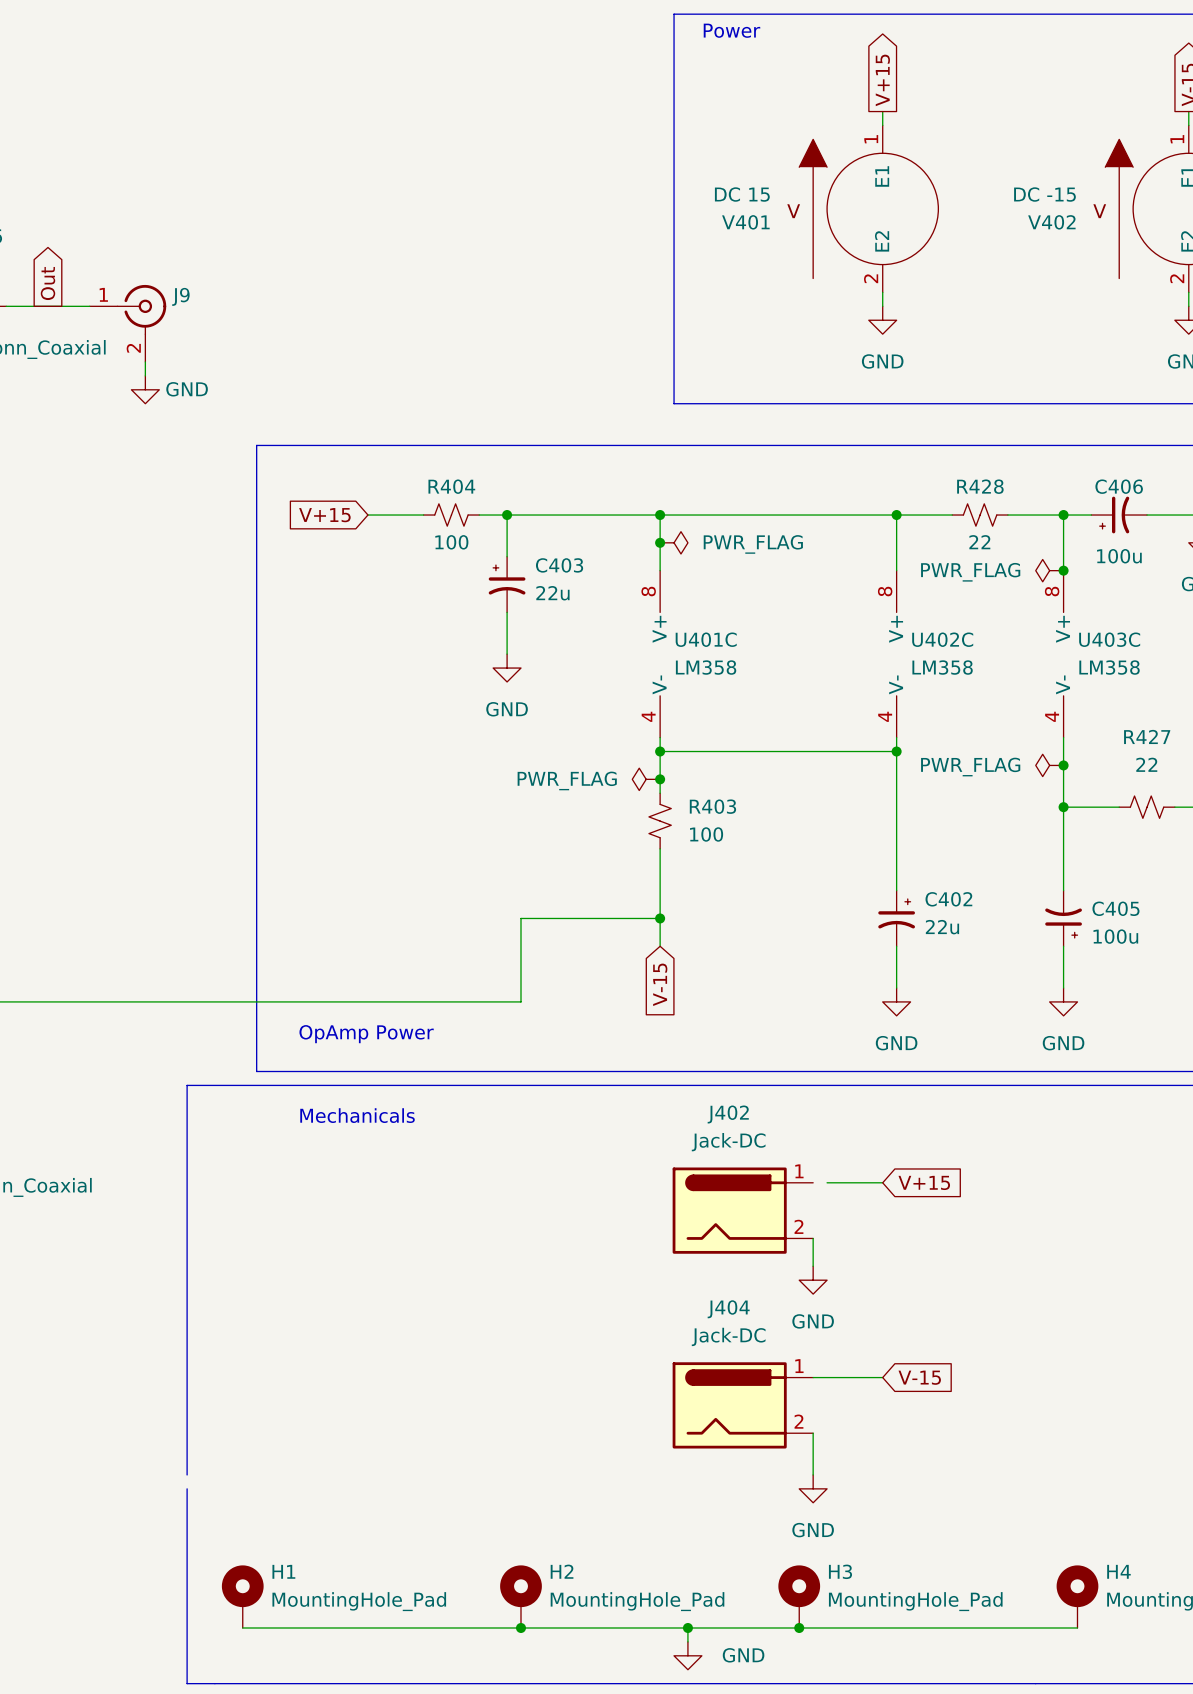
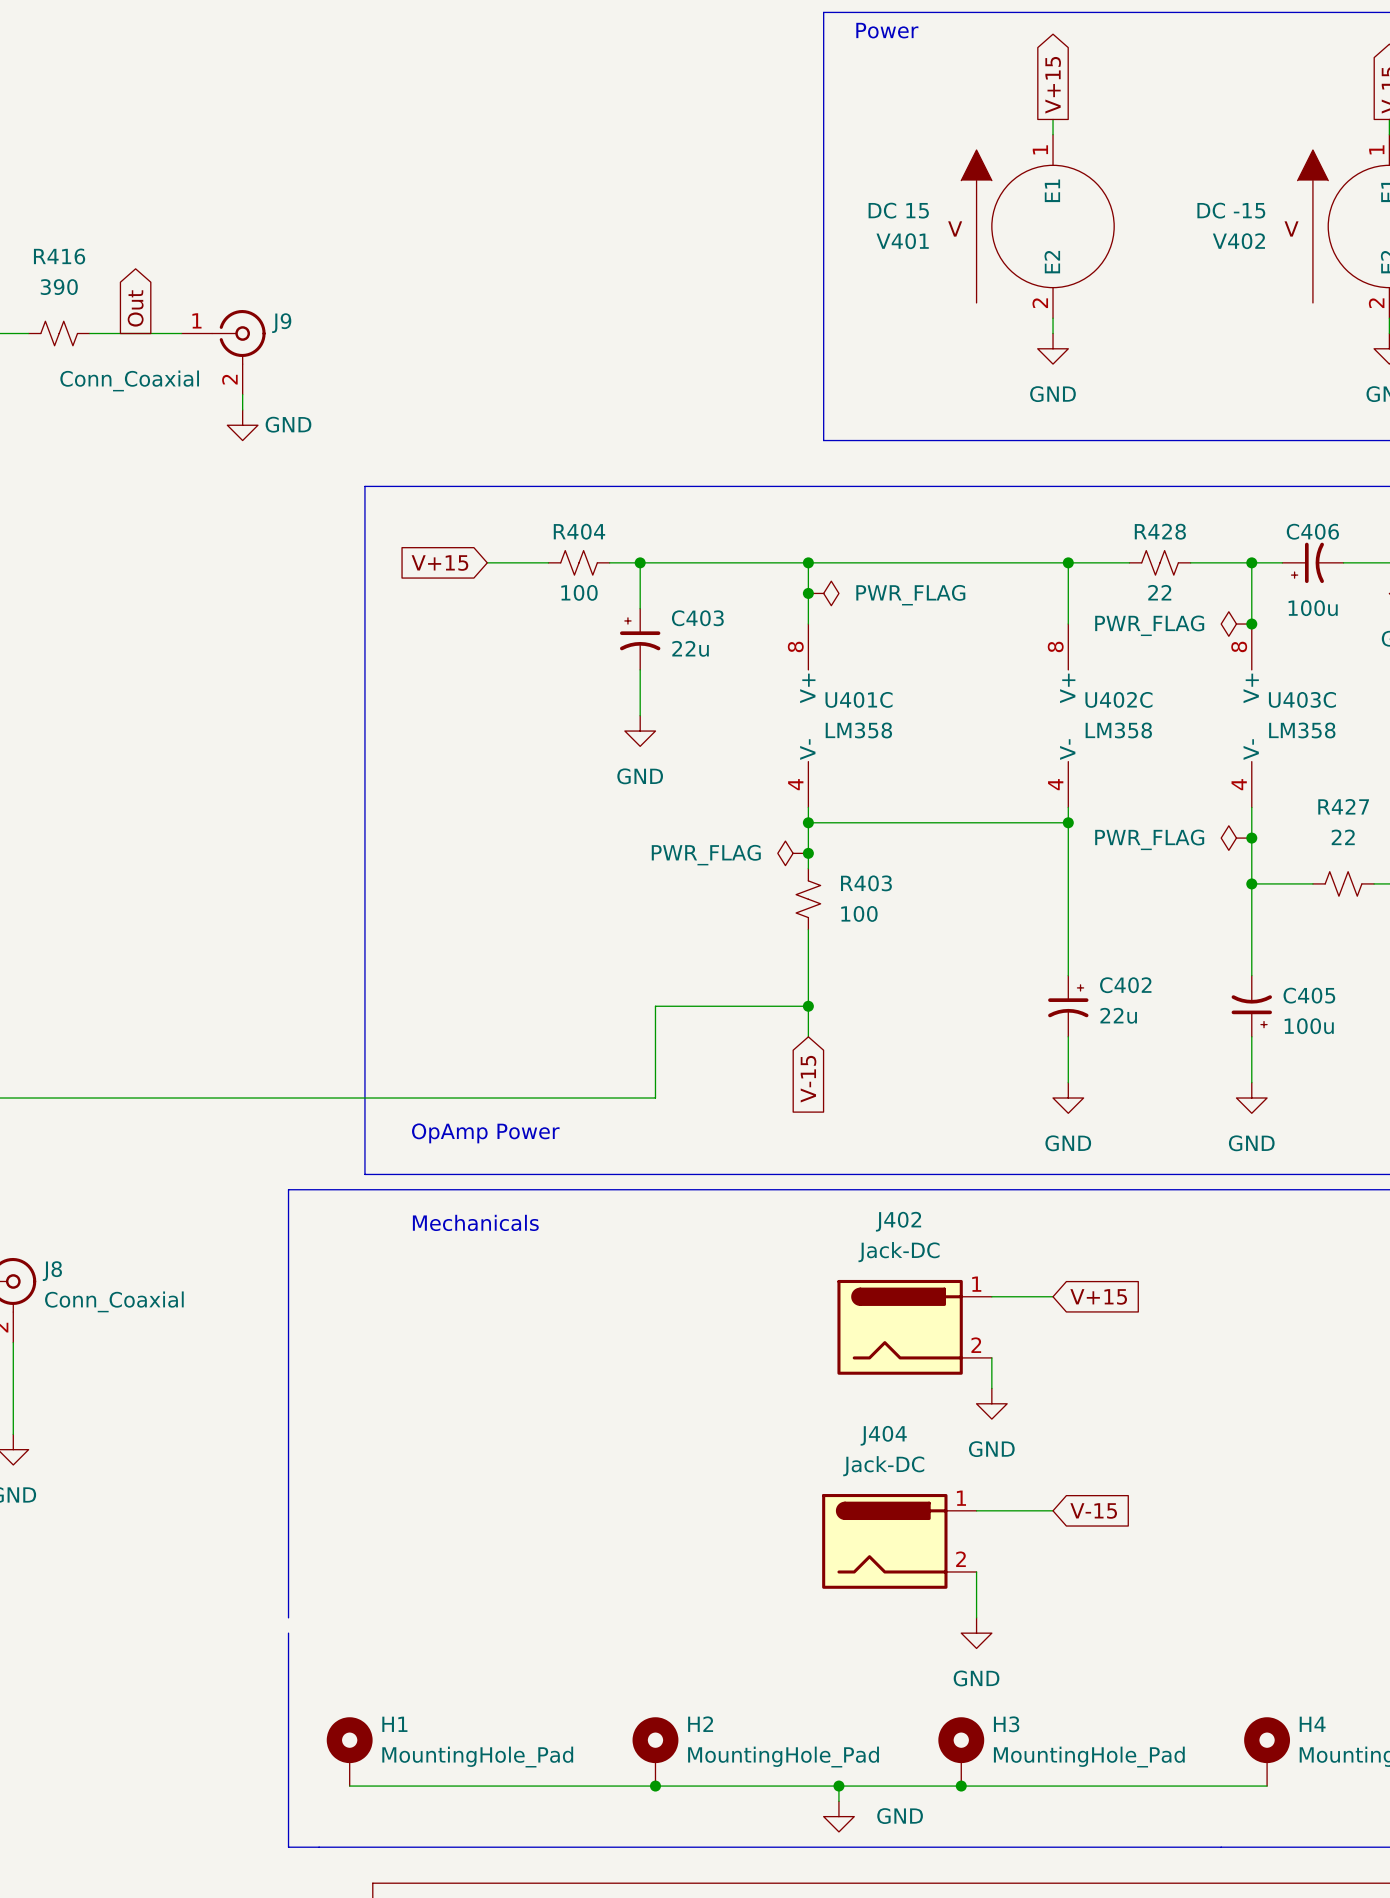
J402 position: (742, 1210) -> (914, 1327)
wire: (813, 1238) (813, 1266) -> (991, 1357) (991, 1388)
power symbol position: GND (813, 1280) -> GND (991, 1403)

